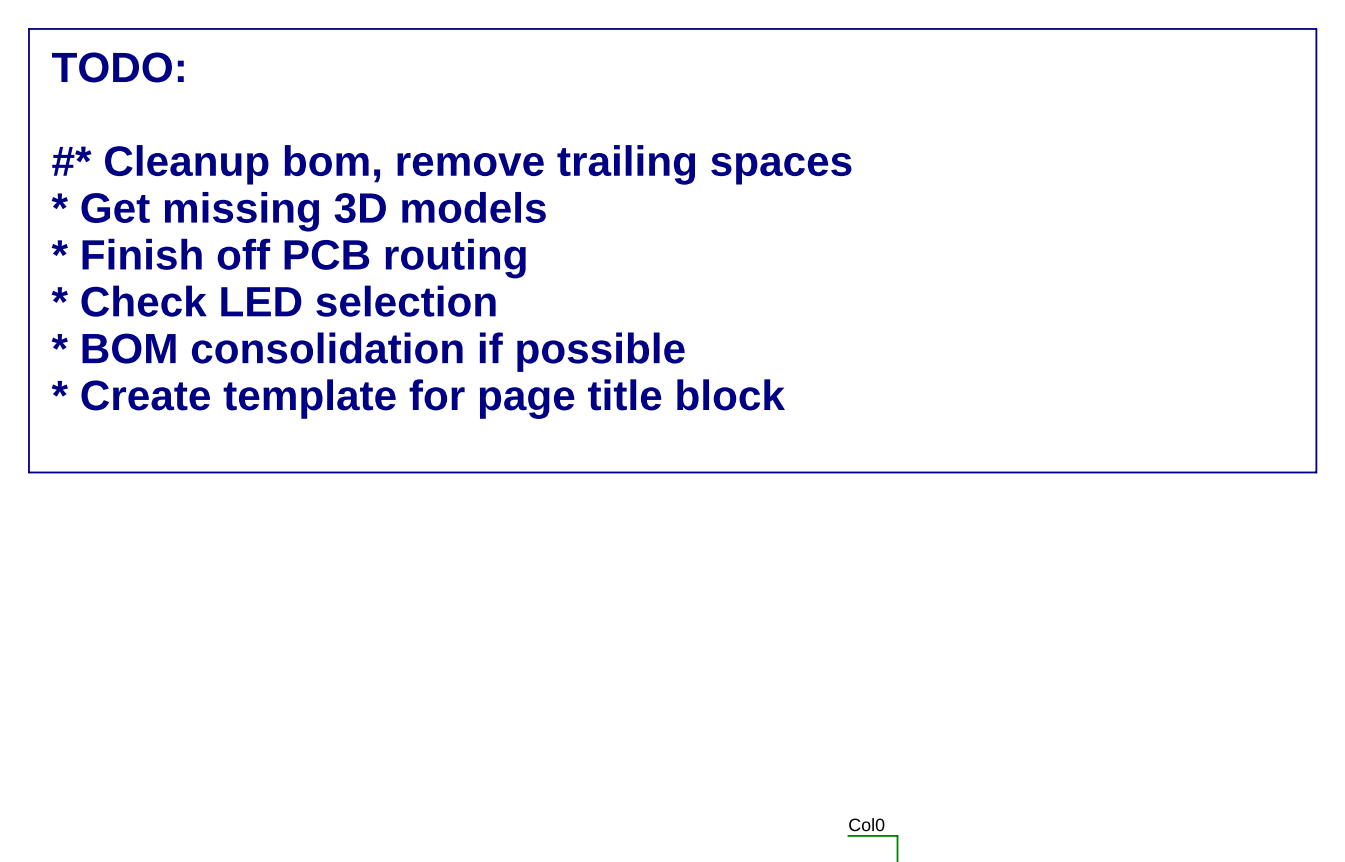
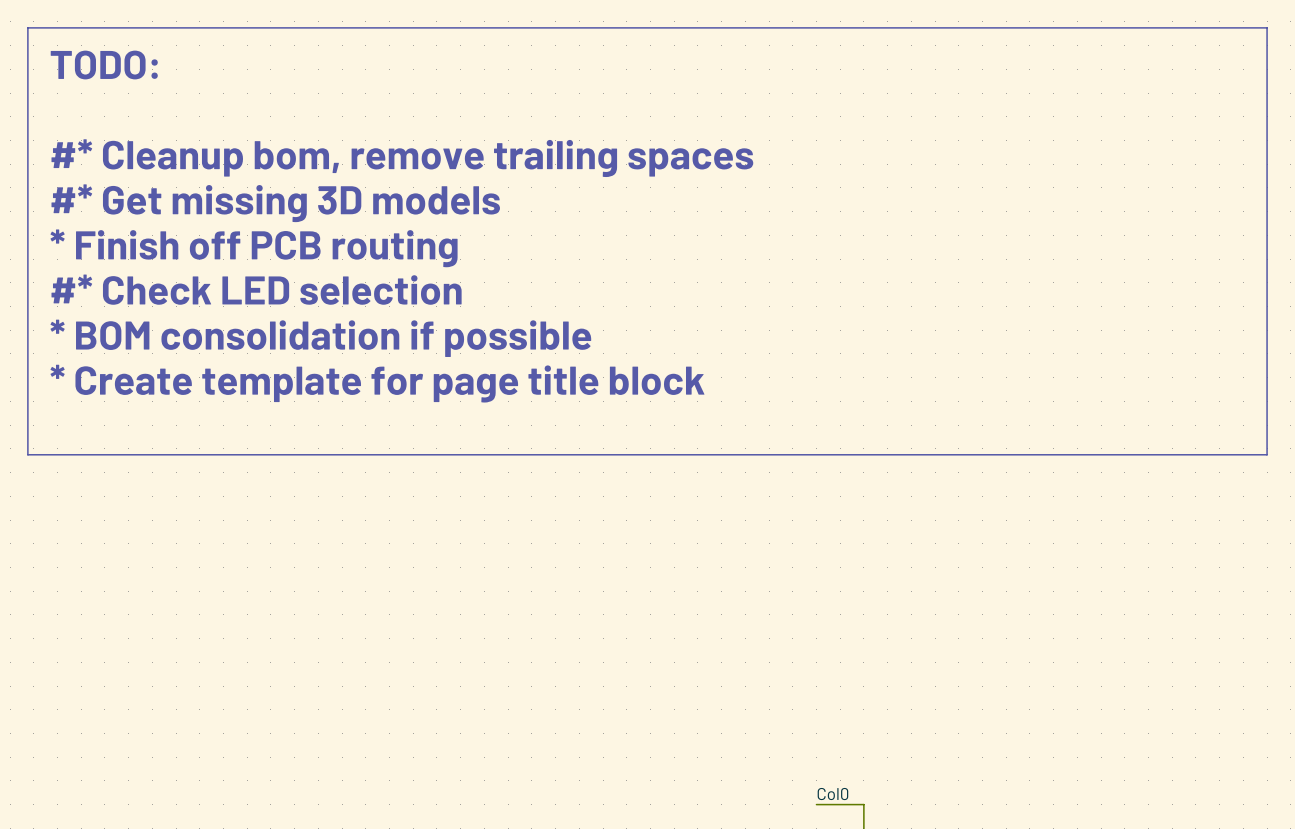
text: * Get missing 3D models (298, 211) -> #* Get missing 3D models (275, 203)
text: * Check LED selection (273, 301) -> #* Check LED selection (256, 289)

